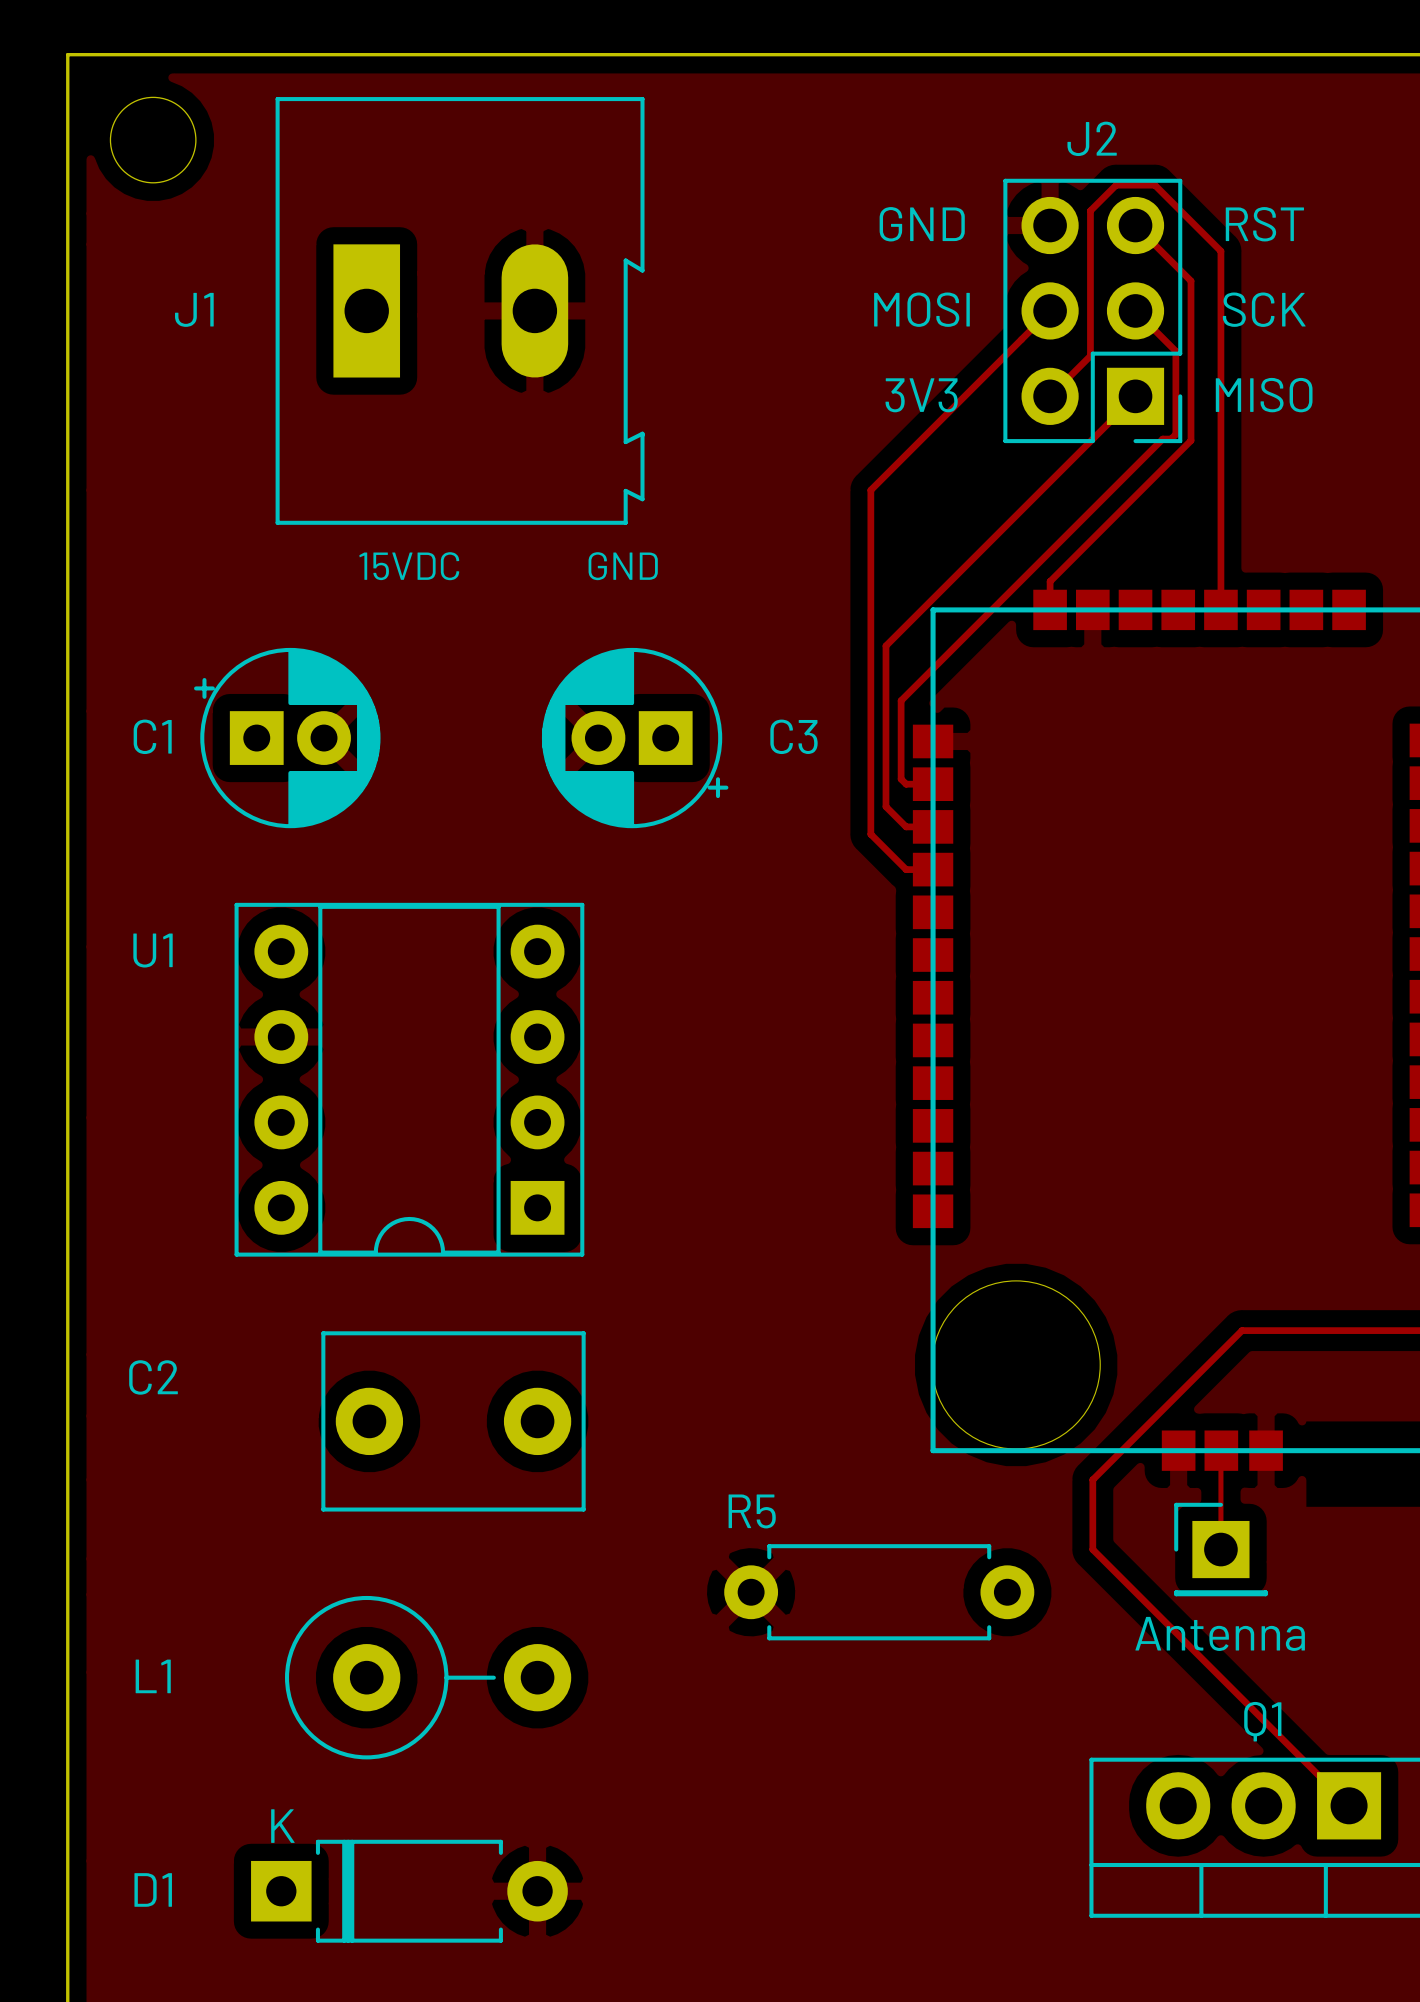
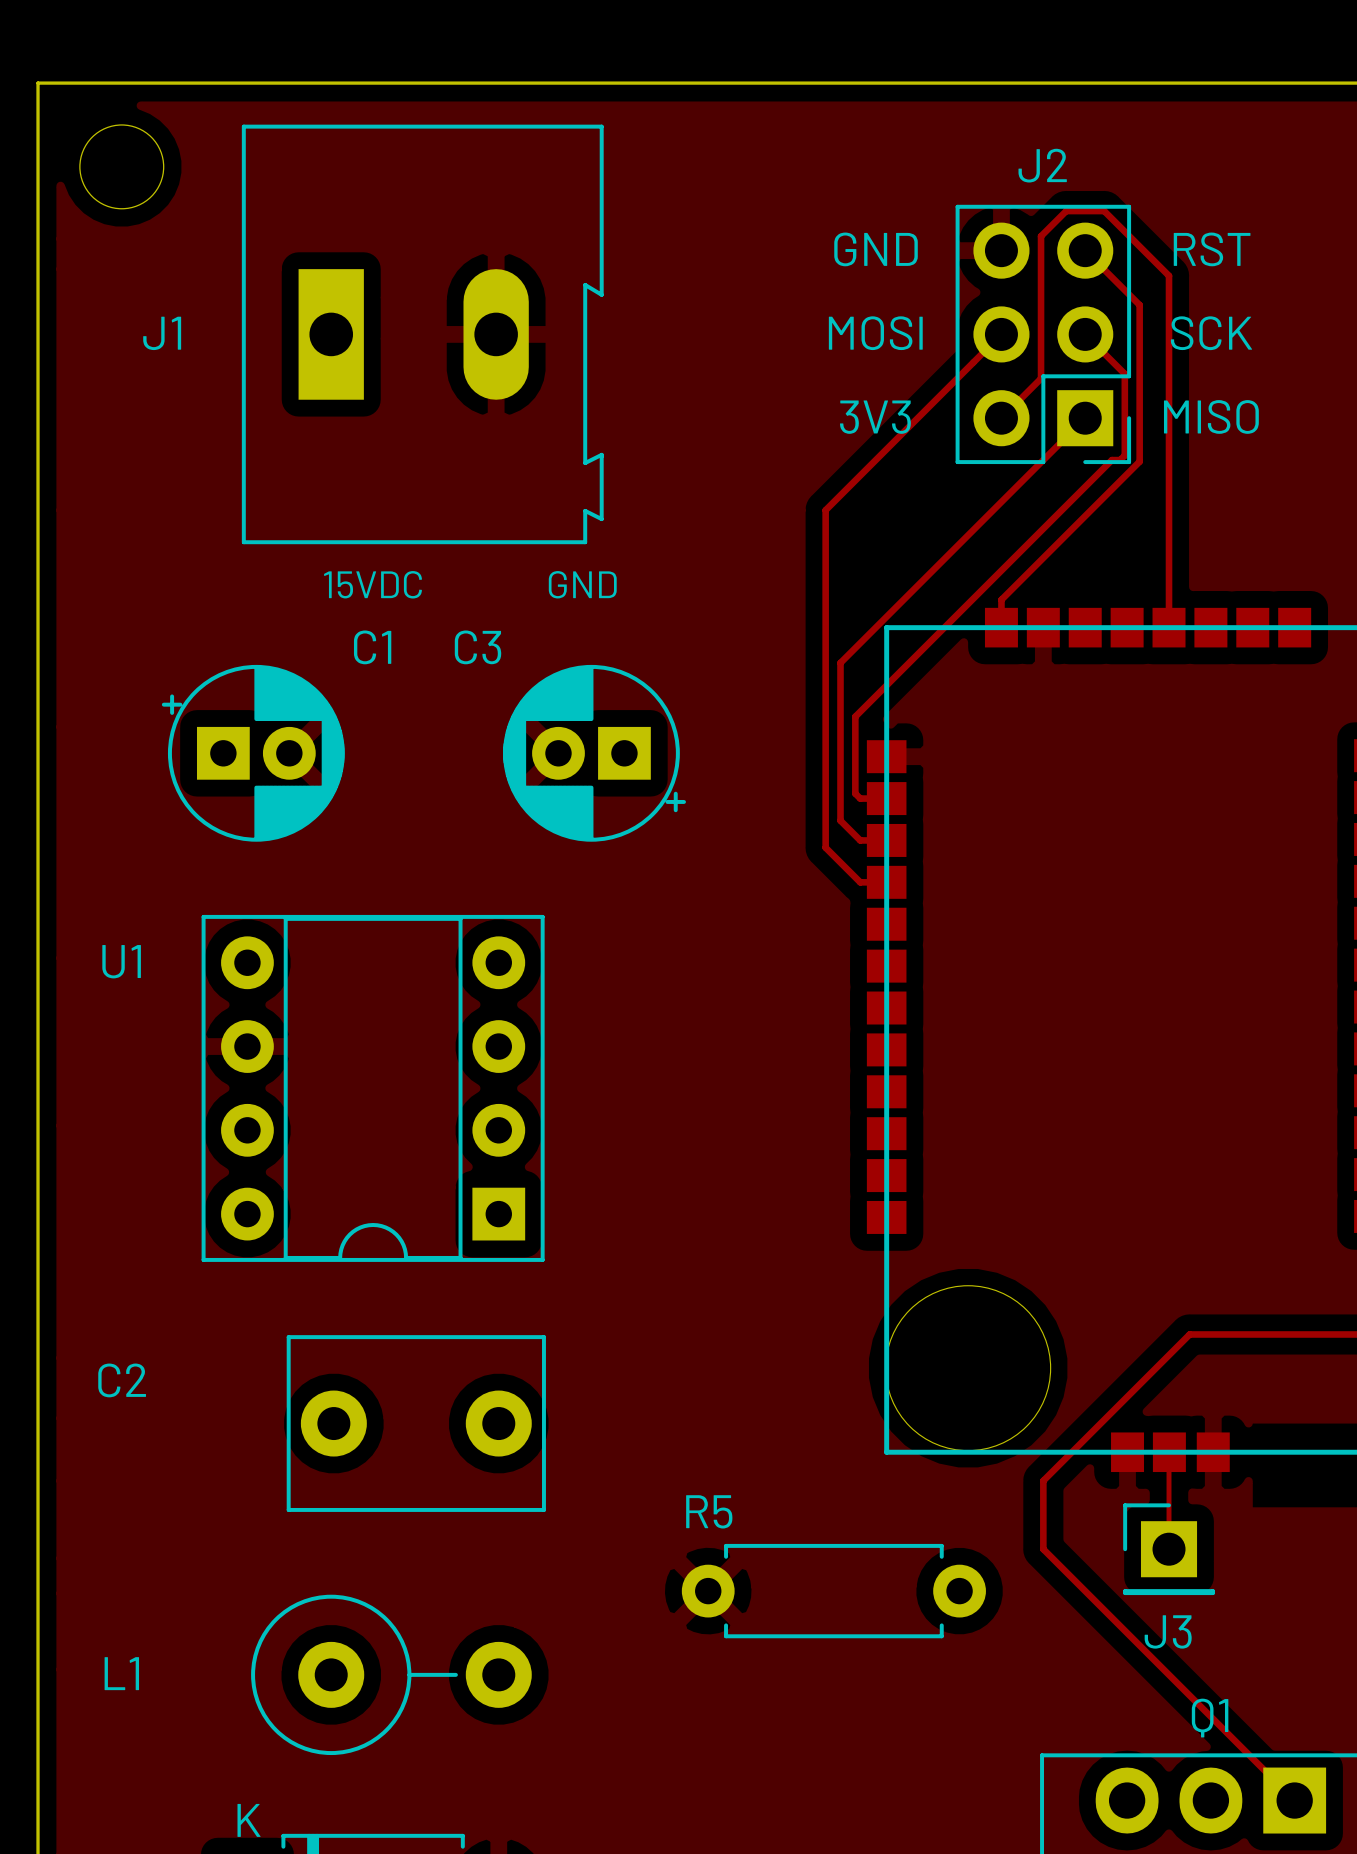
C1 name position: C1 (152, 736) -> C1 (372, 647)
C3 name position: C3 (794, 736) -> C3 (478, 647)
Antenna name: Antenna (1220, 1633) -> J3 (1168, 1631)

